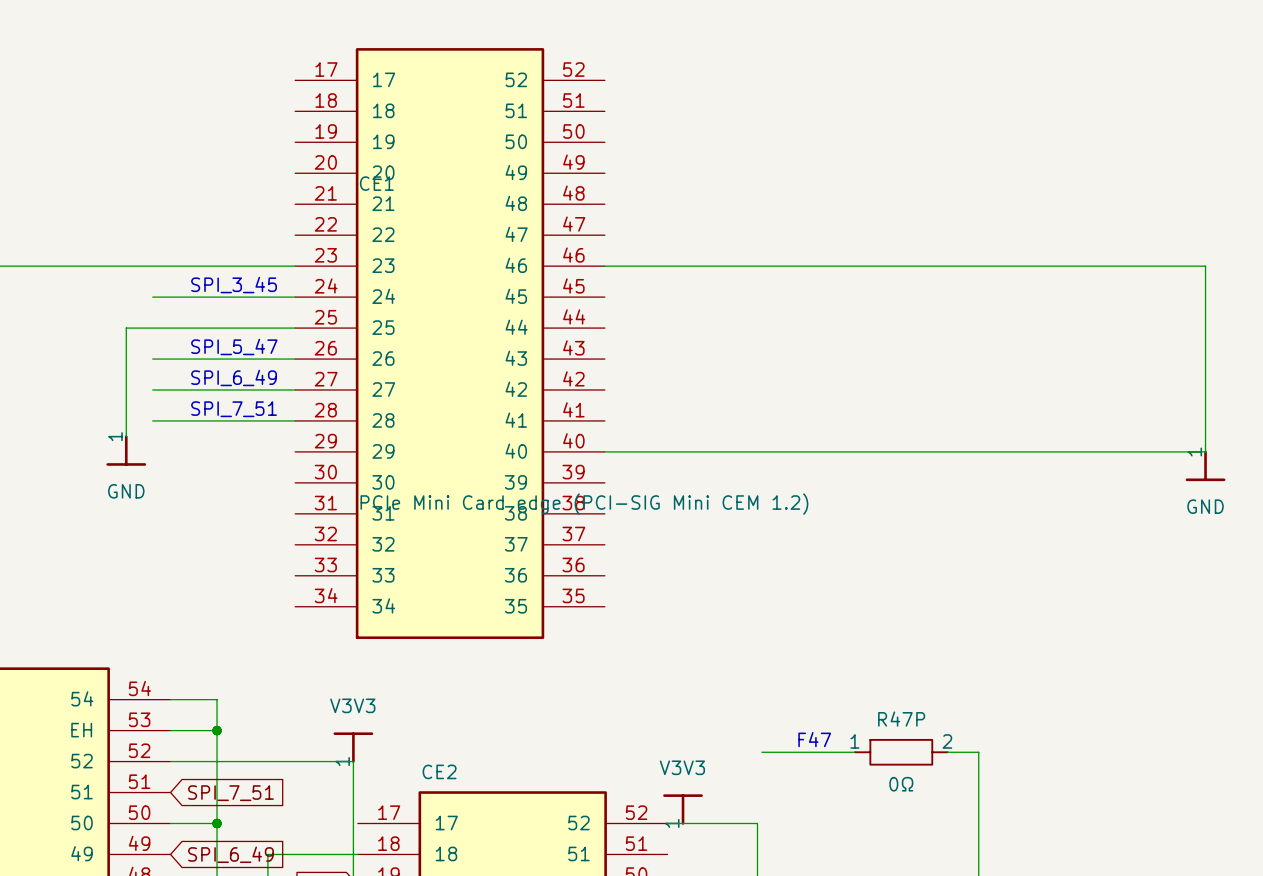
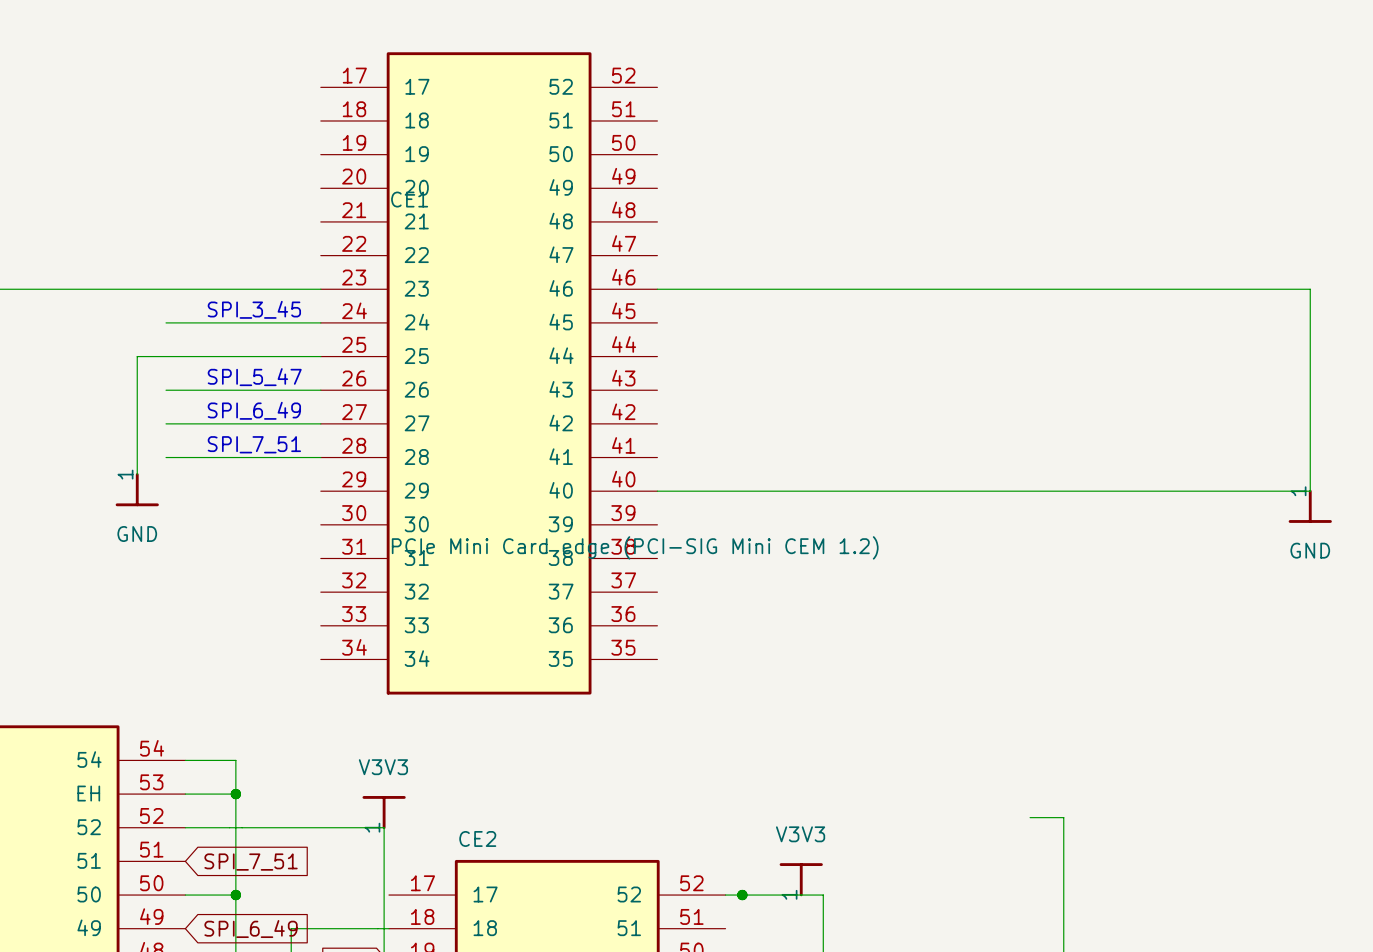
text: F47 (814, 739) -> none
wire: (761, 752) (854, 752) -> none
R47P: 0Ω (901, 752) -> none
V3V3: (683, 809) -> none
V3V3: none -> (801, 879)
junction: none -> (742, 895)

